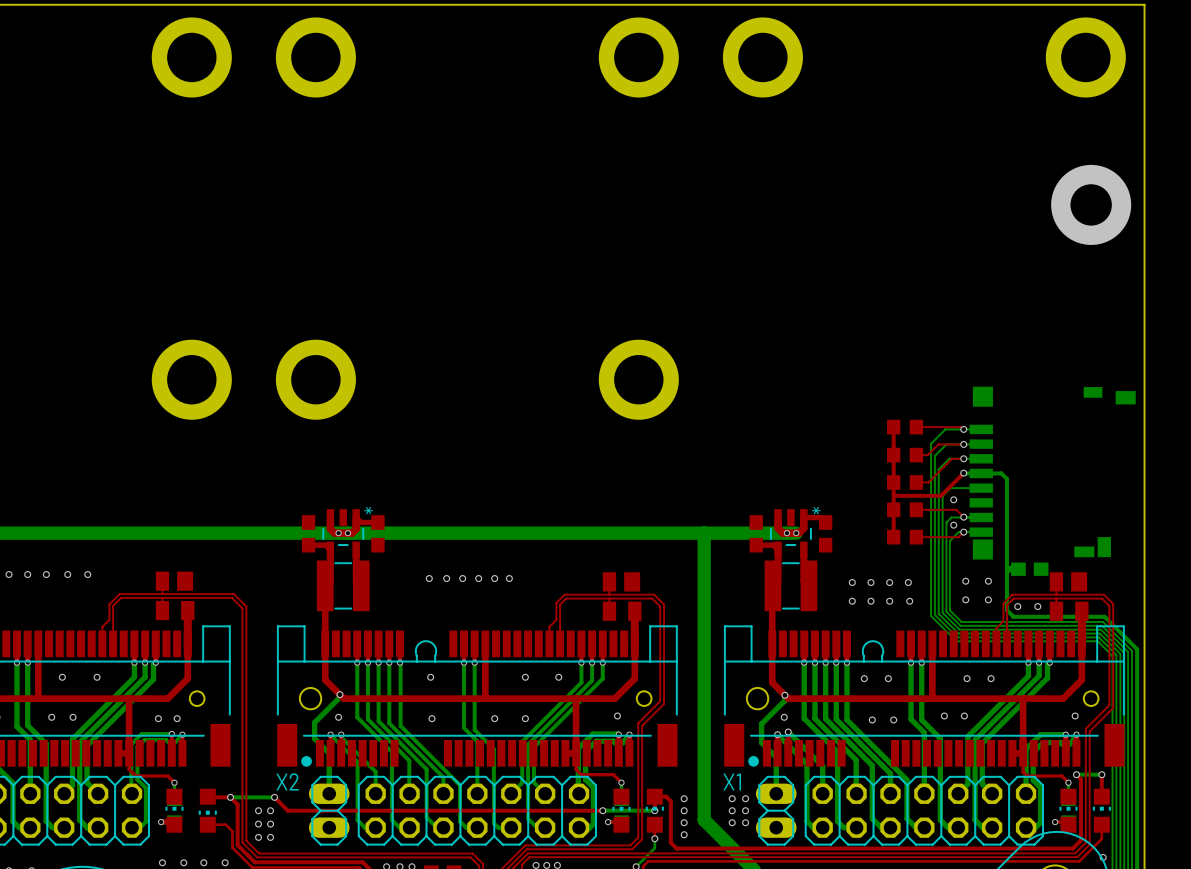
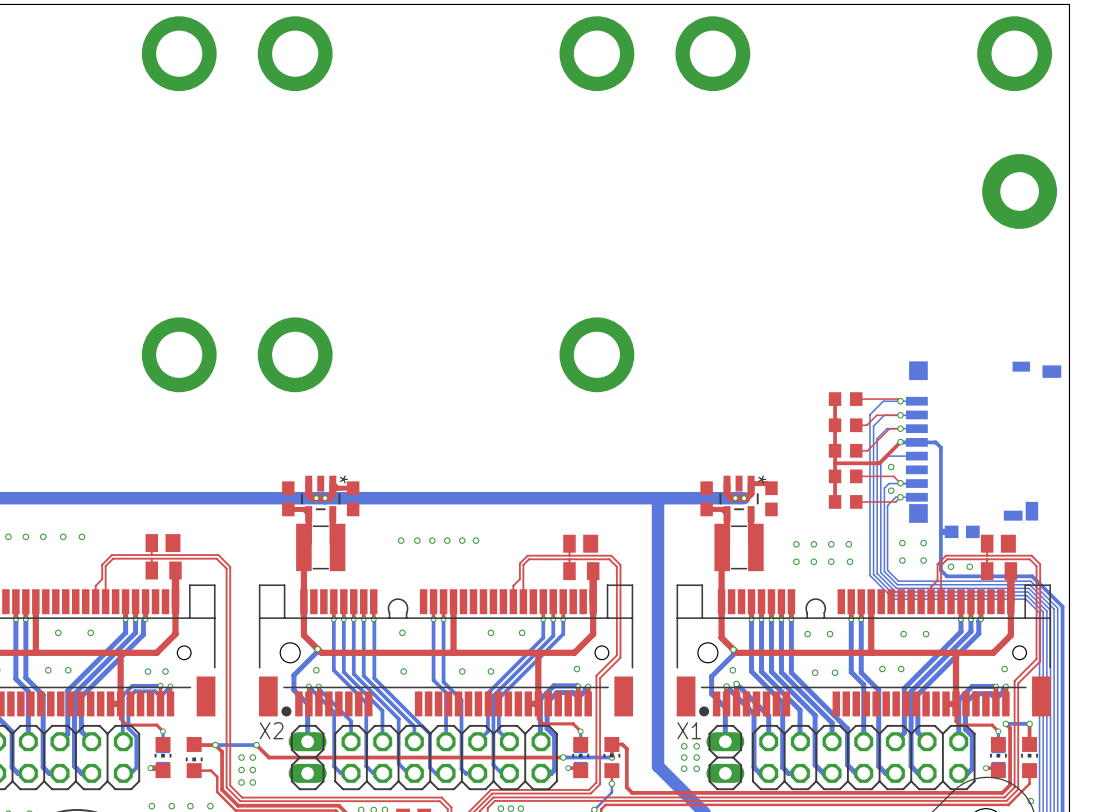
via: (684, 798) -> none
via: (684, 810) -> none
via: (684, 822) -> none
via: (684, 834) -> none

